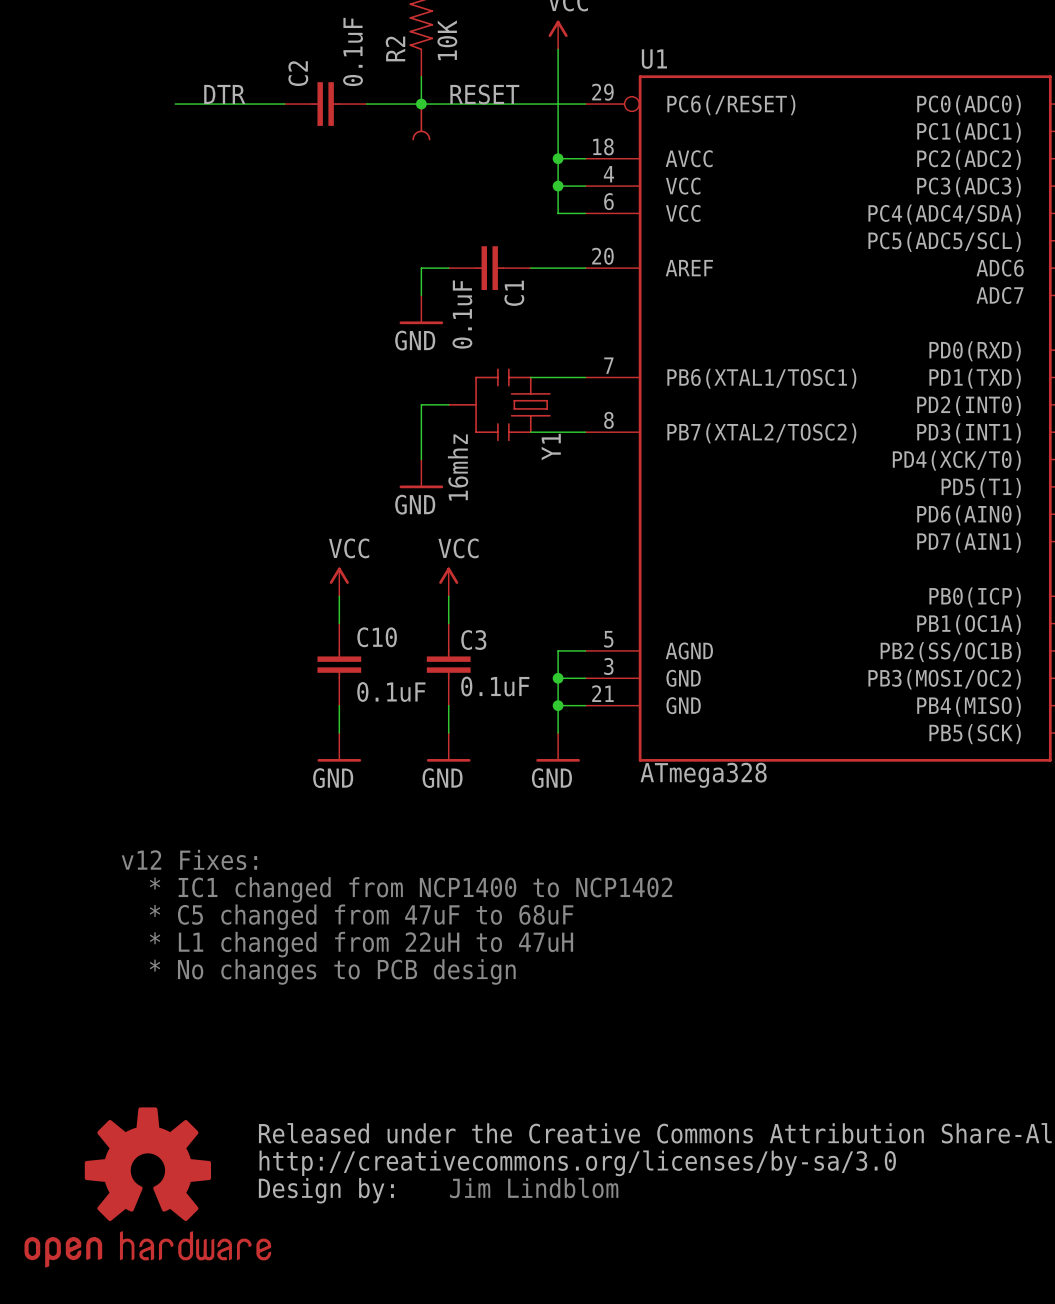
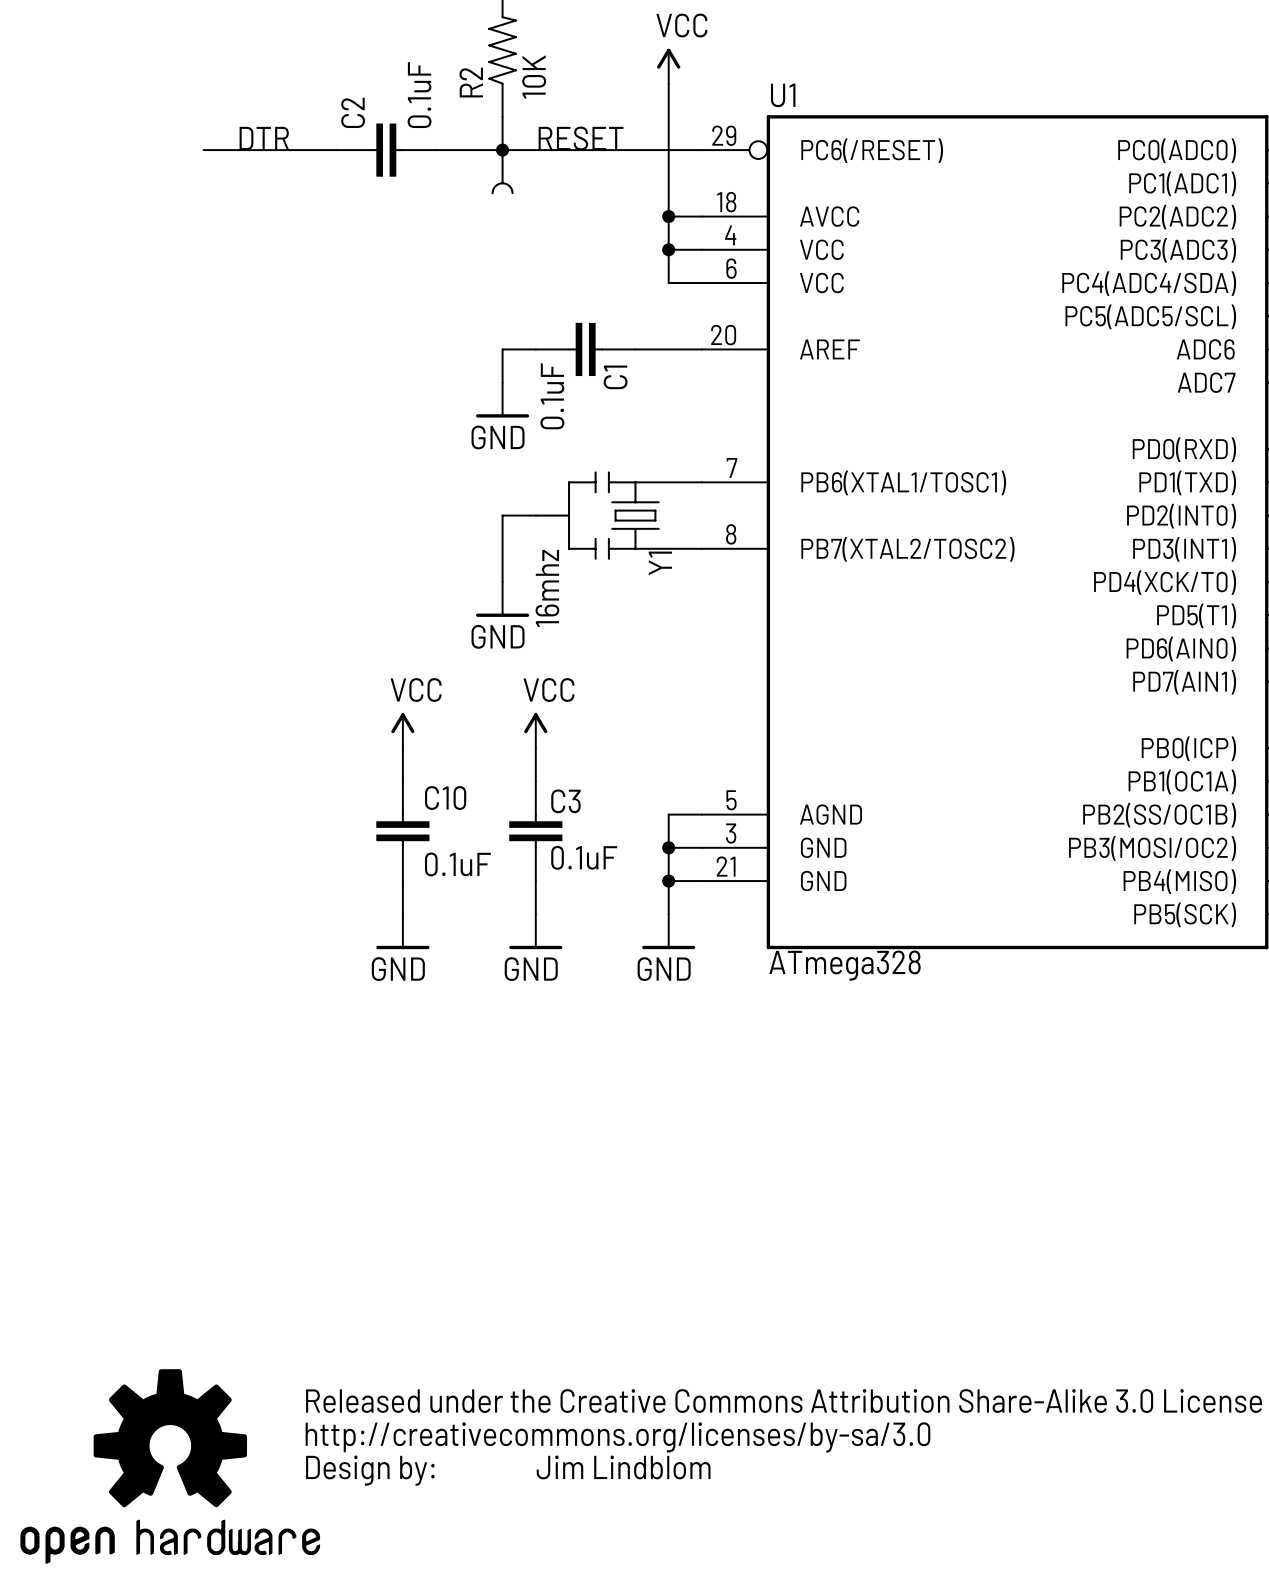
text: v12 Fixes: (189, 859) -> none
text: * IC1 changed from NCP1400 to NCP1402 (411, 889) -> none
text: * C5 changed from 47uF to 68uF (361, 917) -> none
text: * L1 changed from 22uH to 47uH (361, 944) -> none
text: * No changes to PCB design (332, 971) -> none

